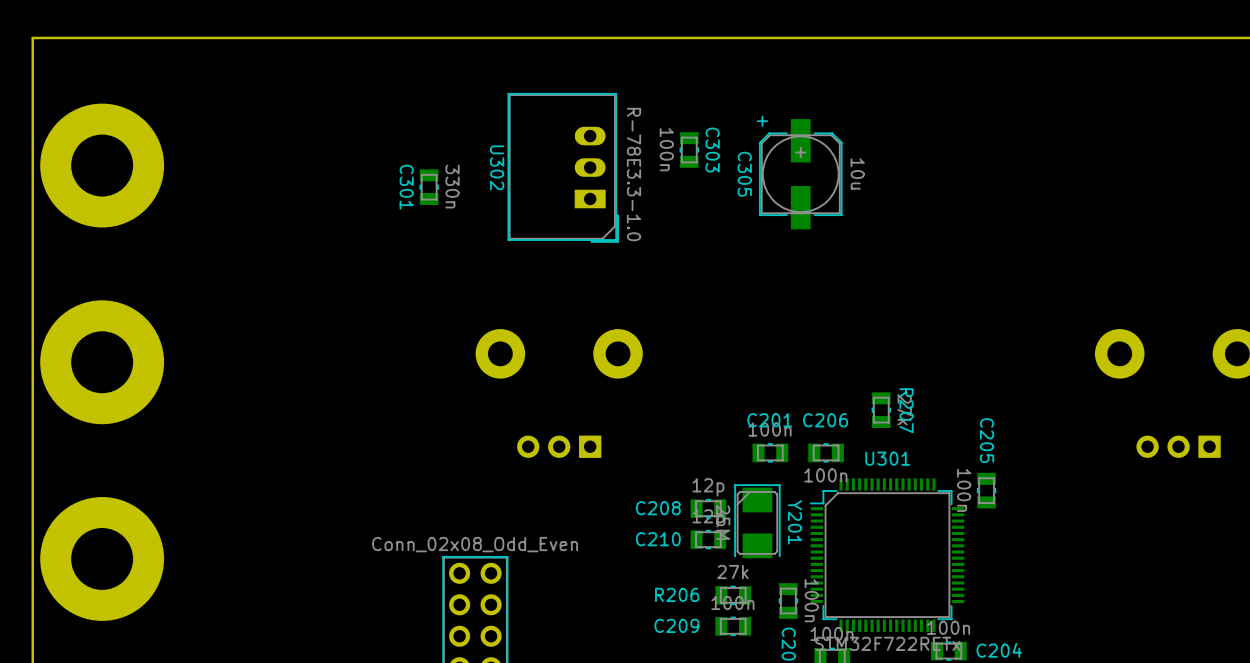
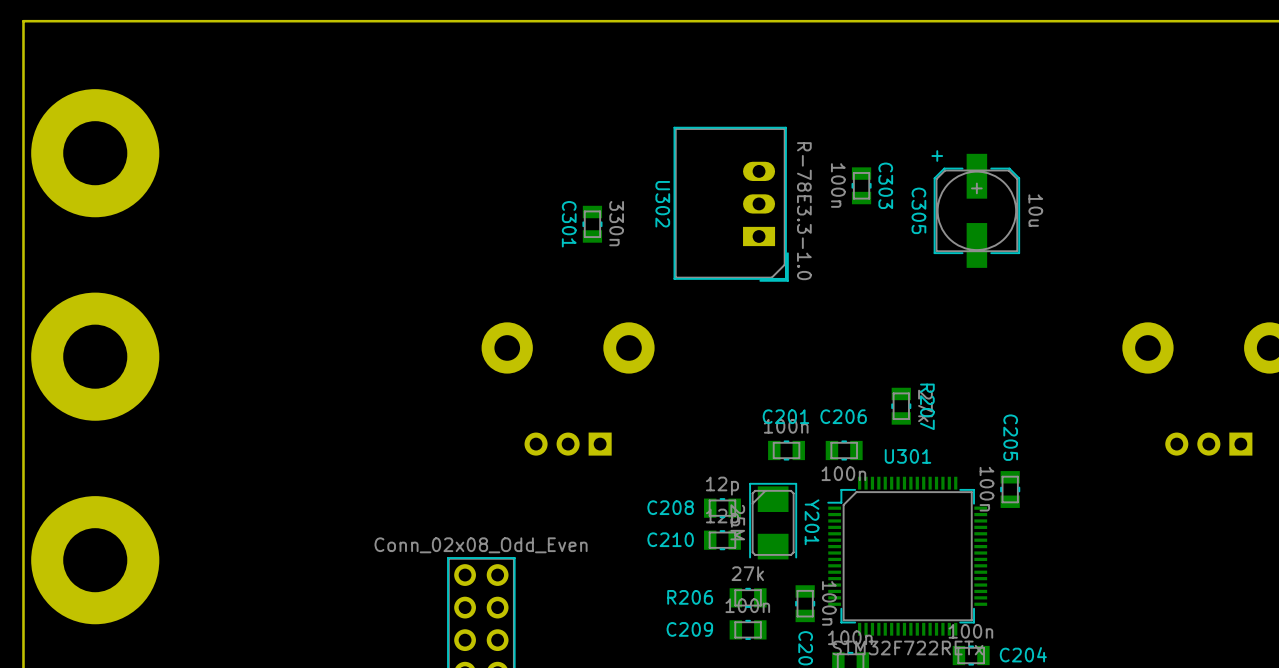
C303 position: (689, 150) -> (861, 185)
U302 position: (563, 167) -> (731, 204)
C305 position: (800, 174) -> (976, 210)
C301 position: (429, 187) -> (592, 224)

